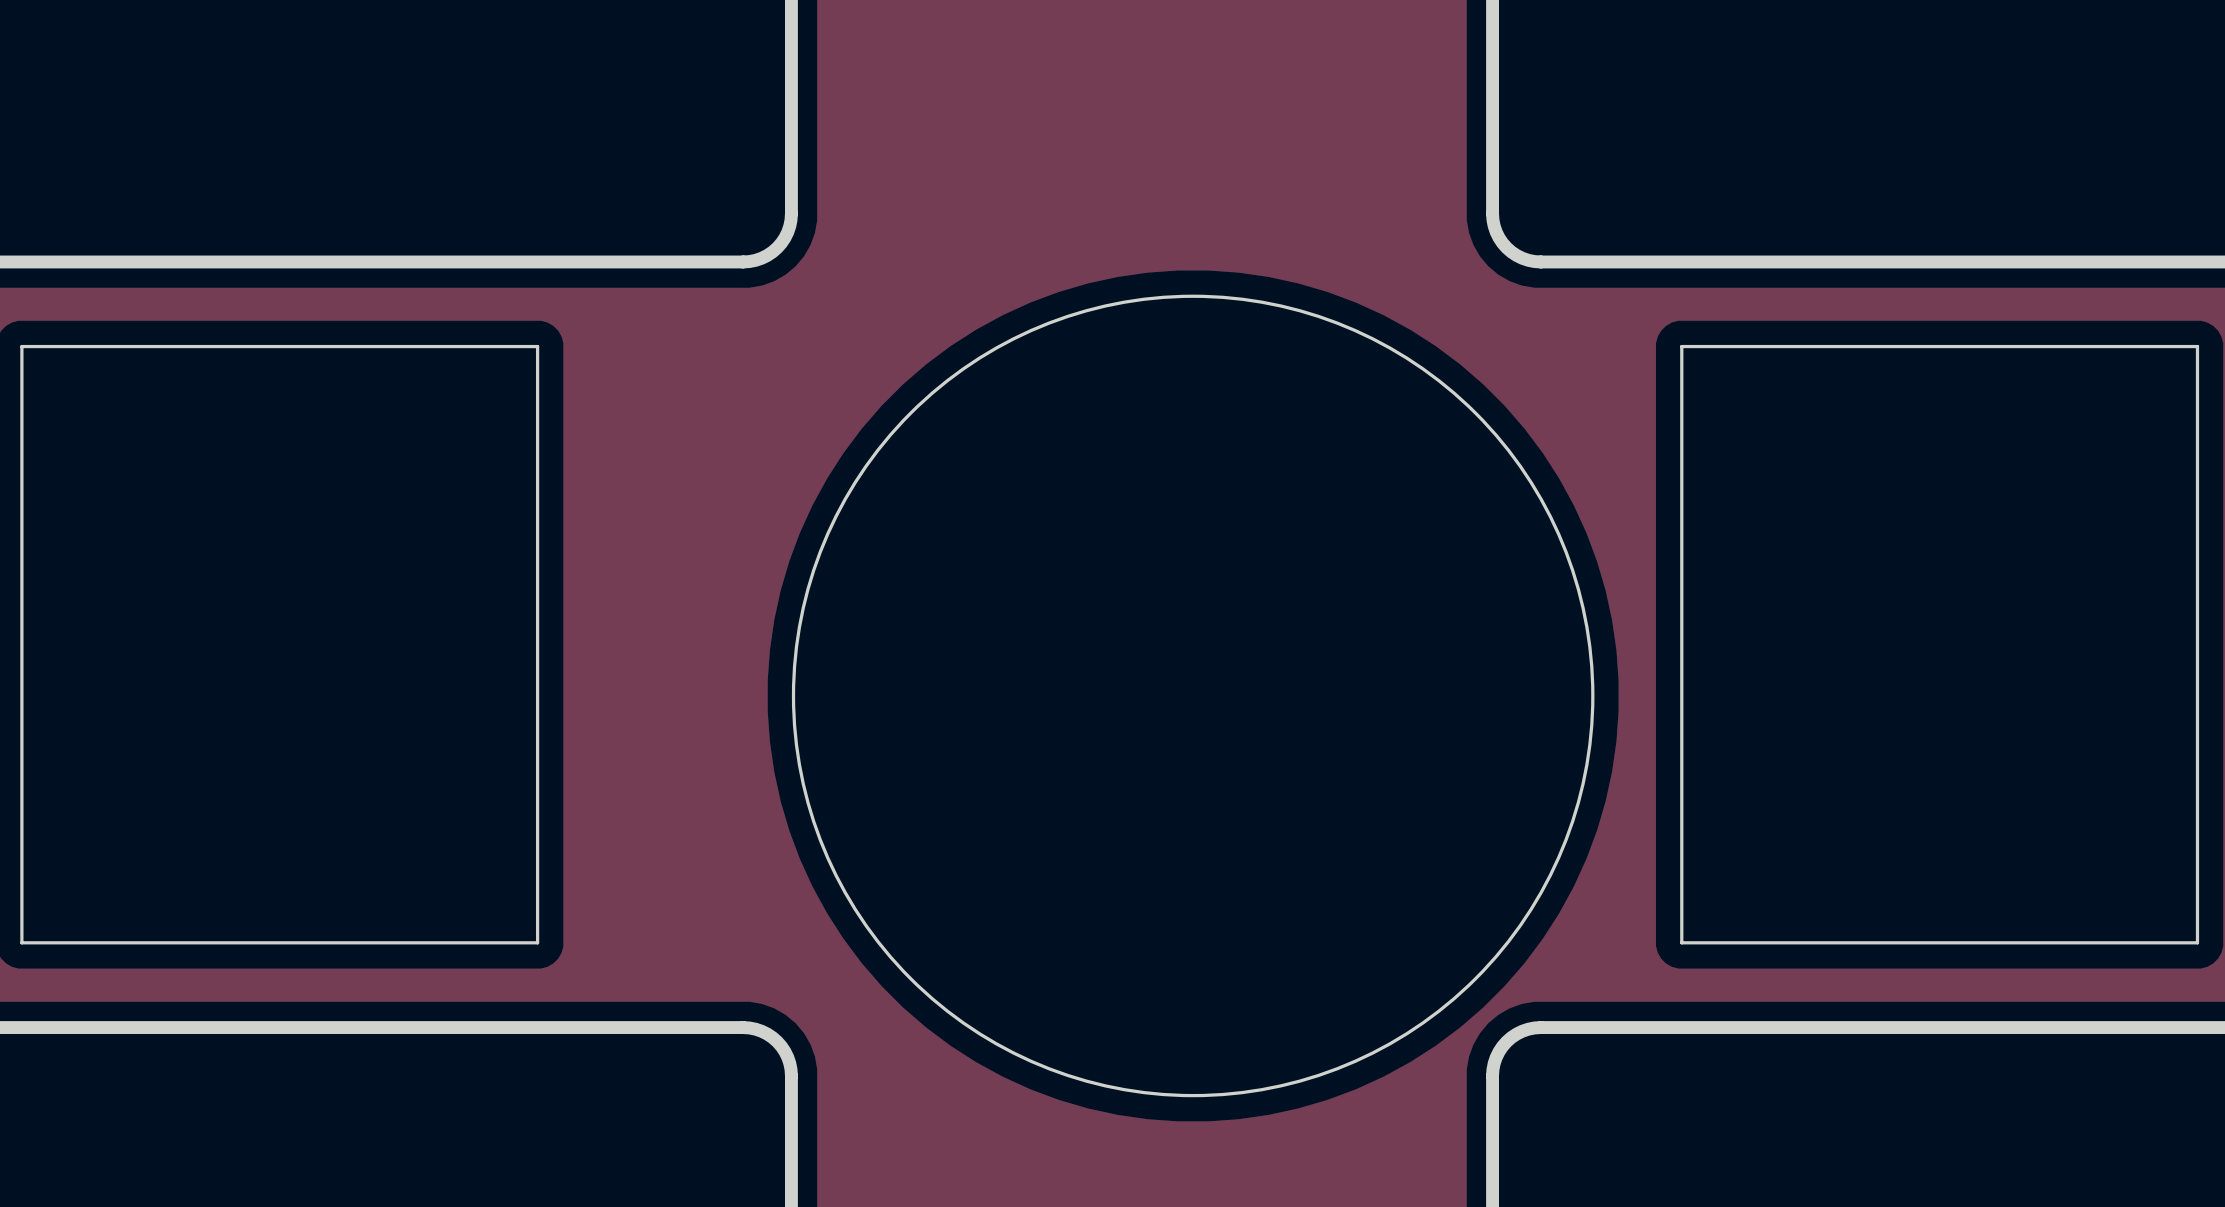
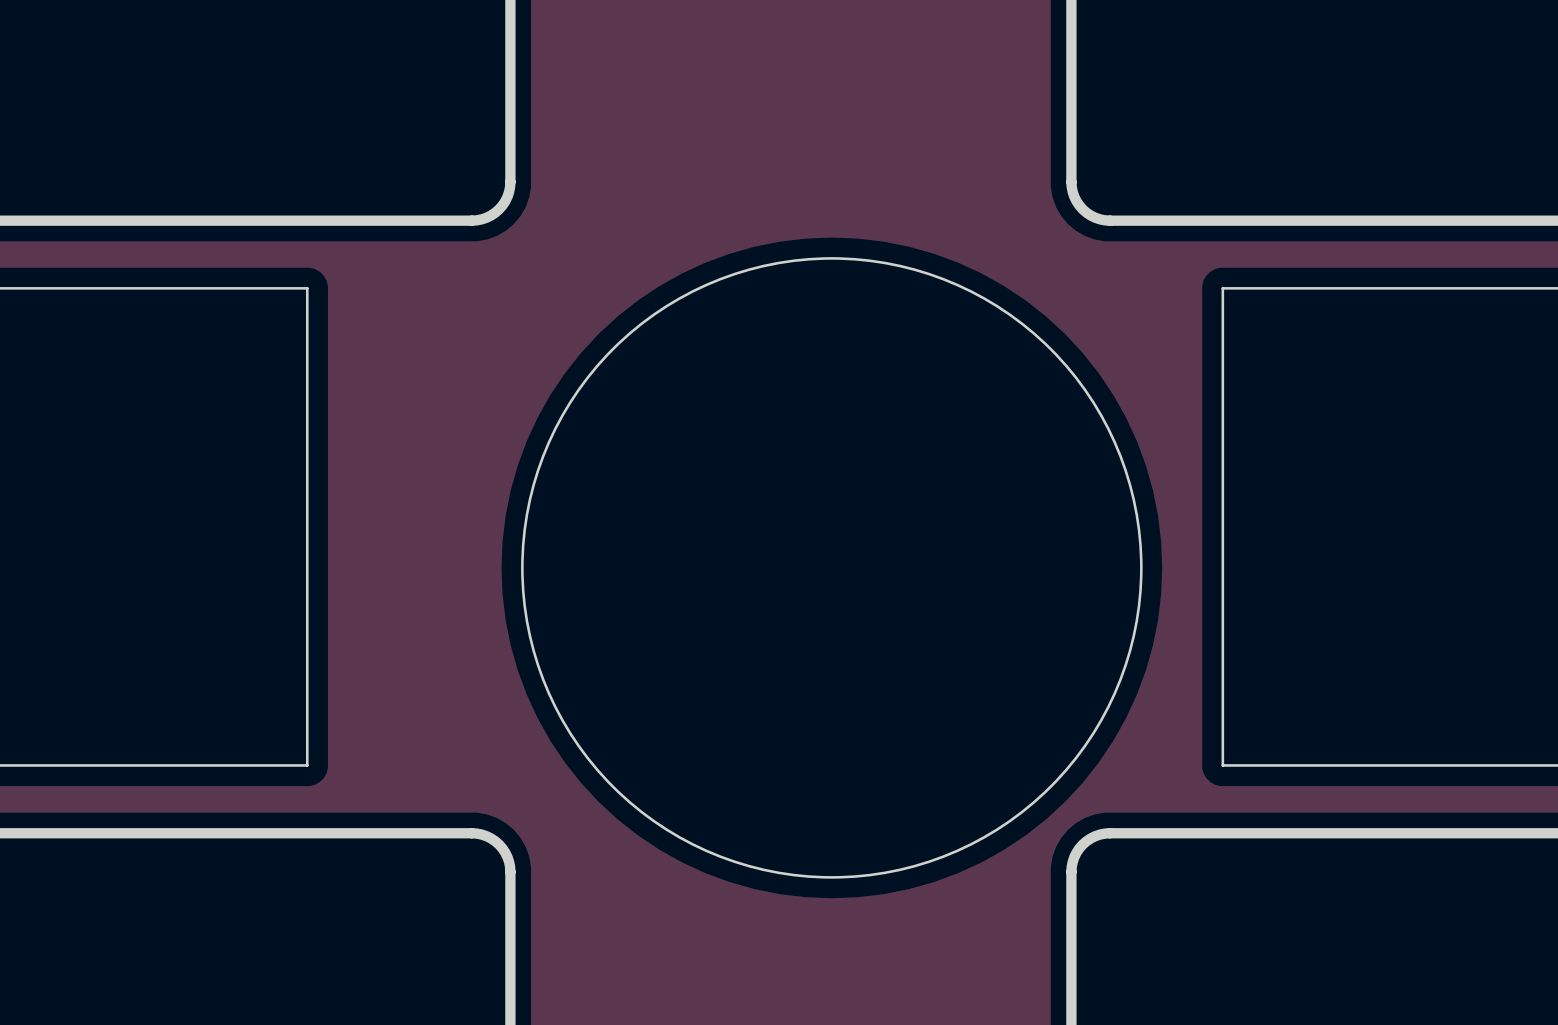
round board edge size: [791, 294, 1595, 1098] -> [521, 257, 1143, 879]

